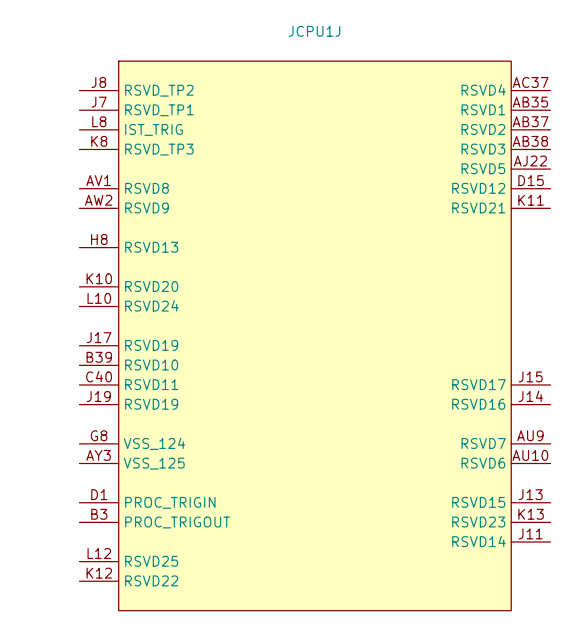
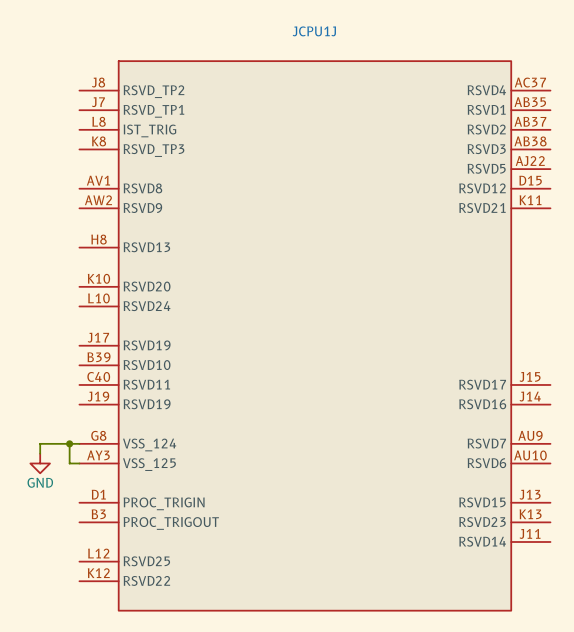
wire: none -> (69, 443) (69, 463) (79, 463)
junction: none -> (69, 443)
wire: none -> (79, 443) (40, 443) (40, 453)
power symbol: none -> GND (40, 463)

